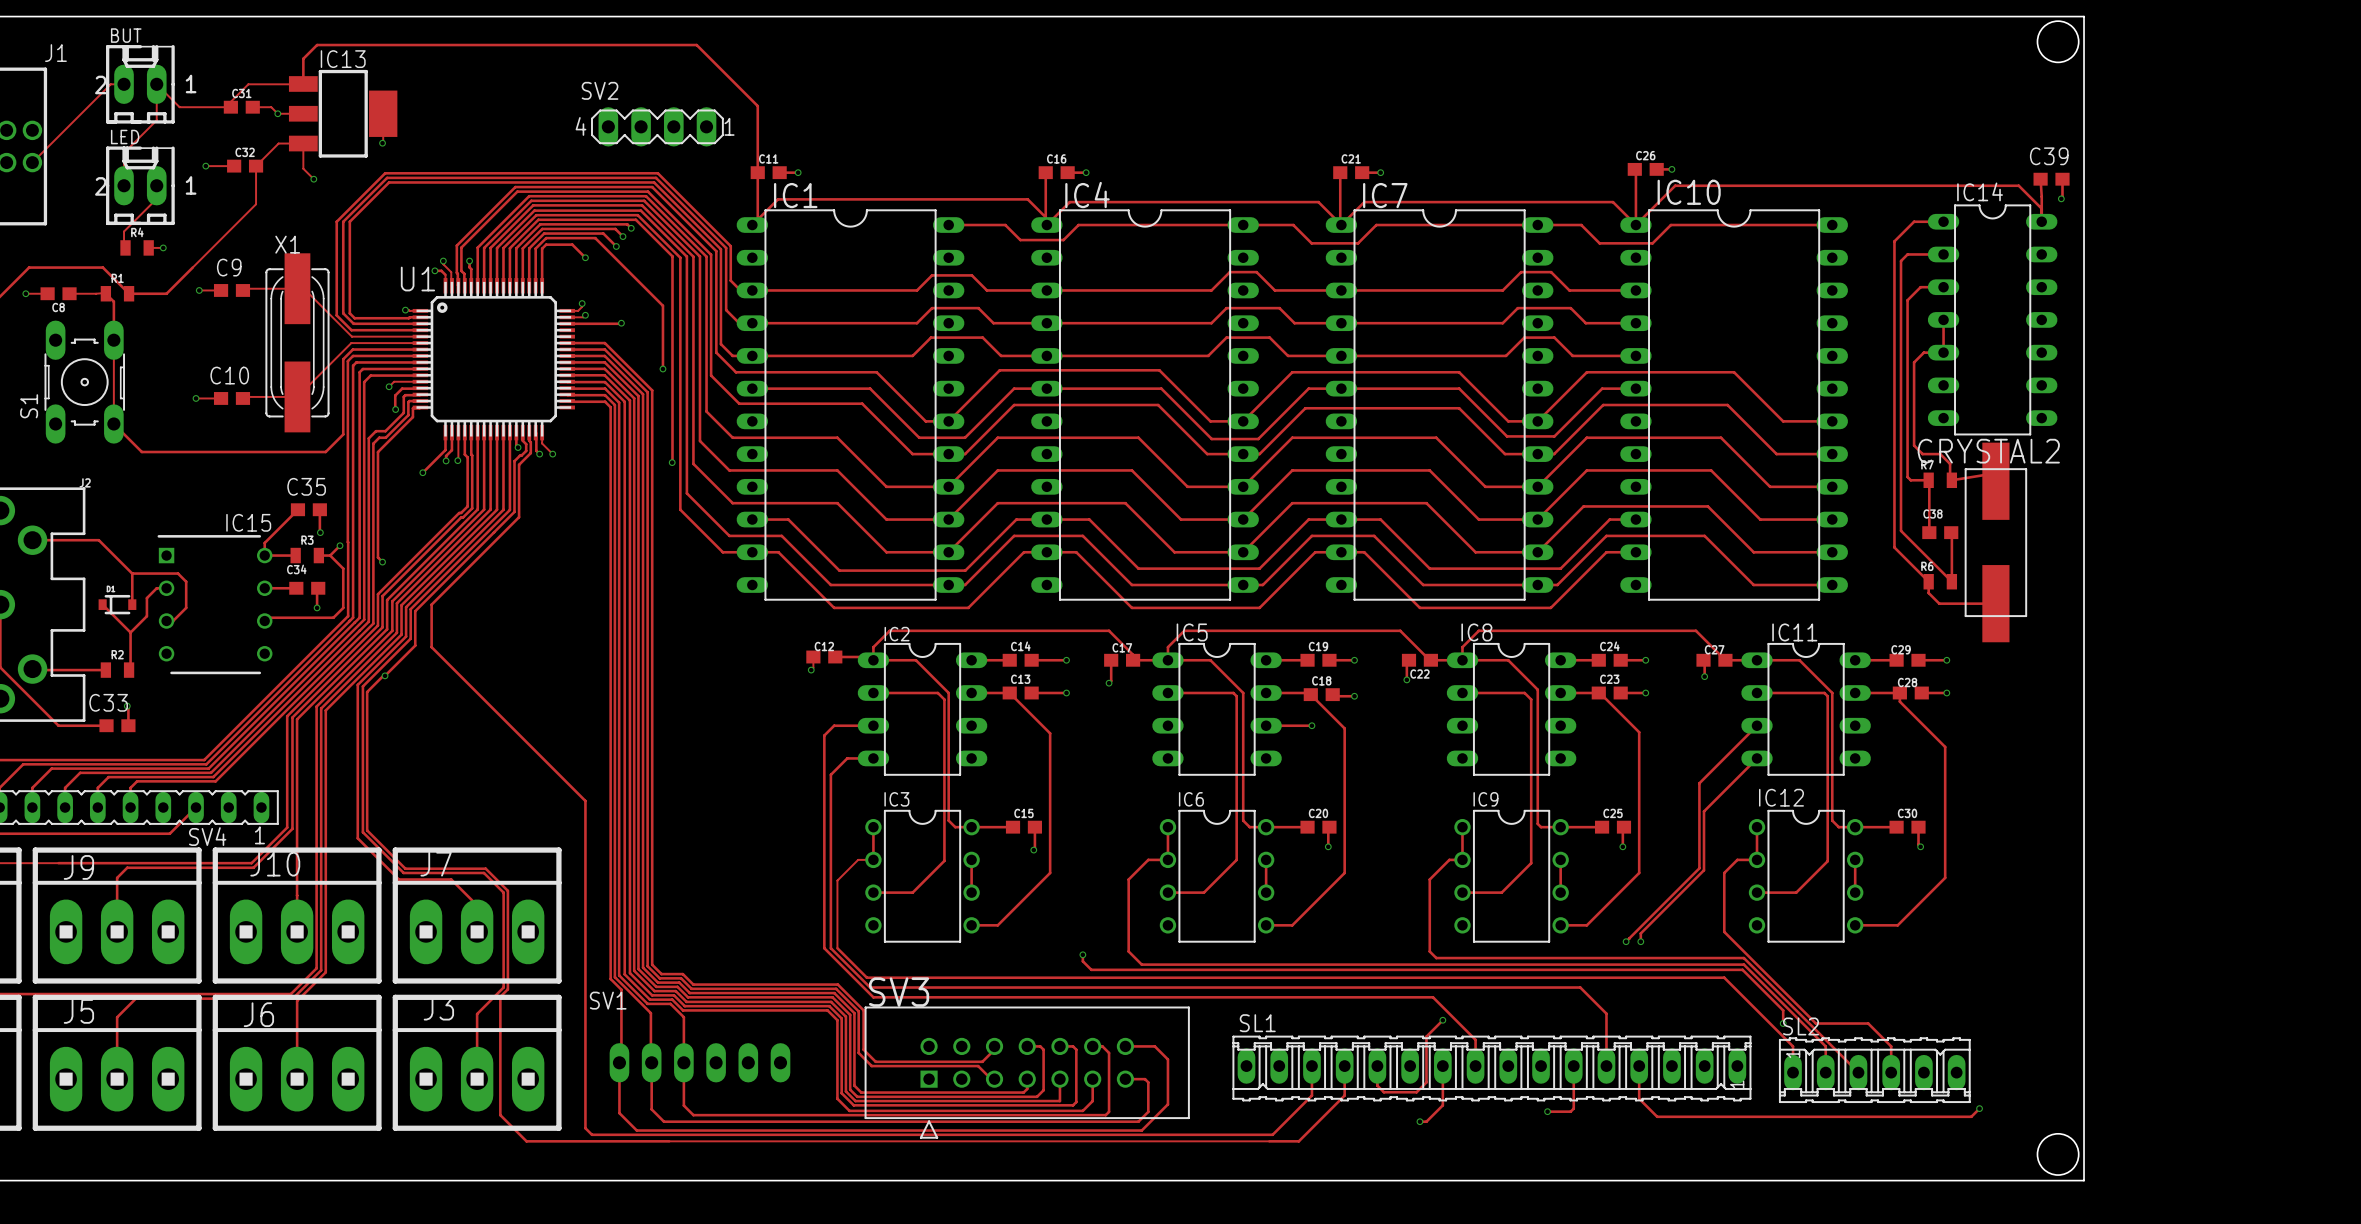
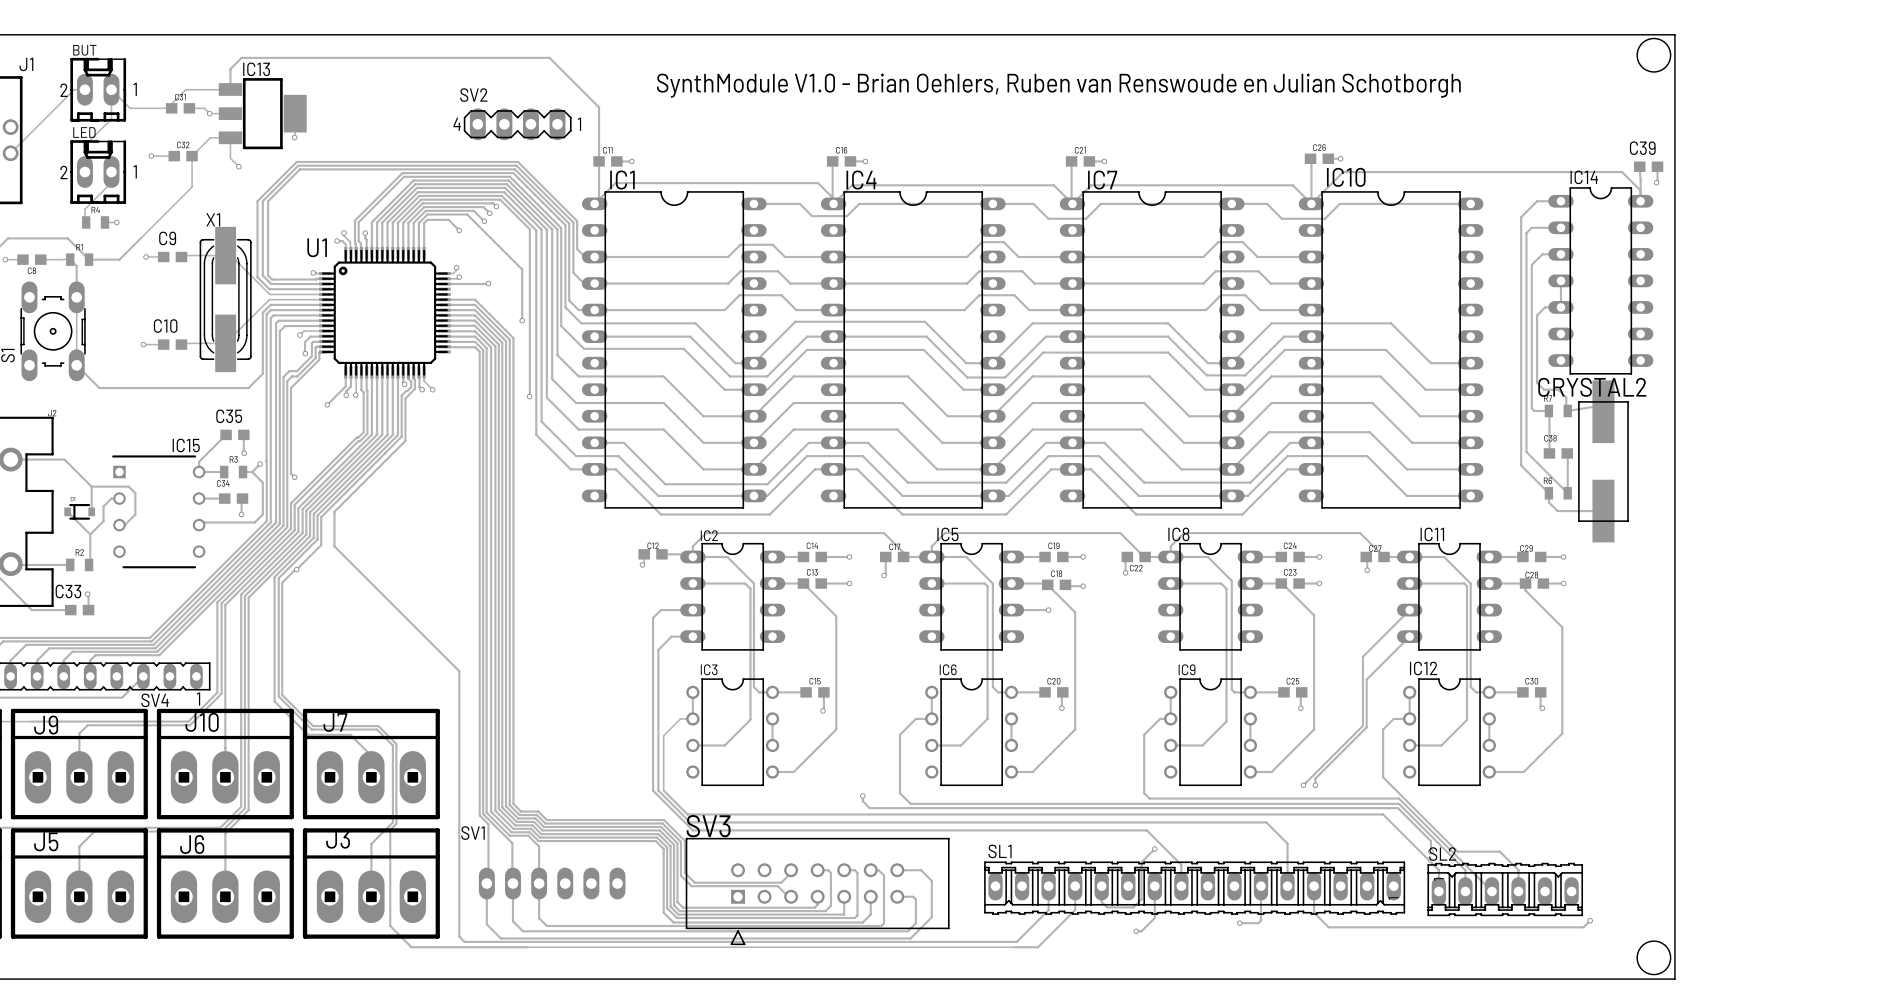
text: none -> SynthModule V1.0 - Brian Oehlers, Ruben van Renswoude en Julian Schotborgh (1058, 85)

